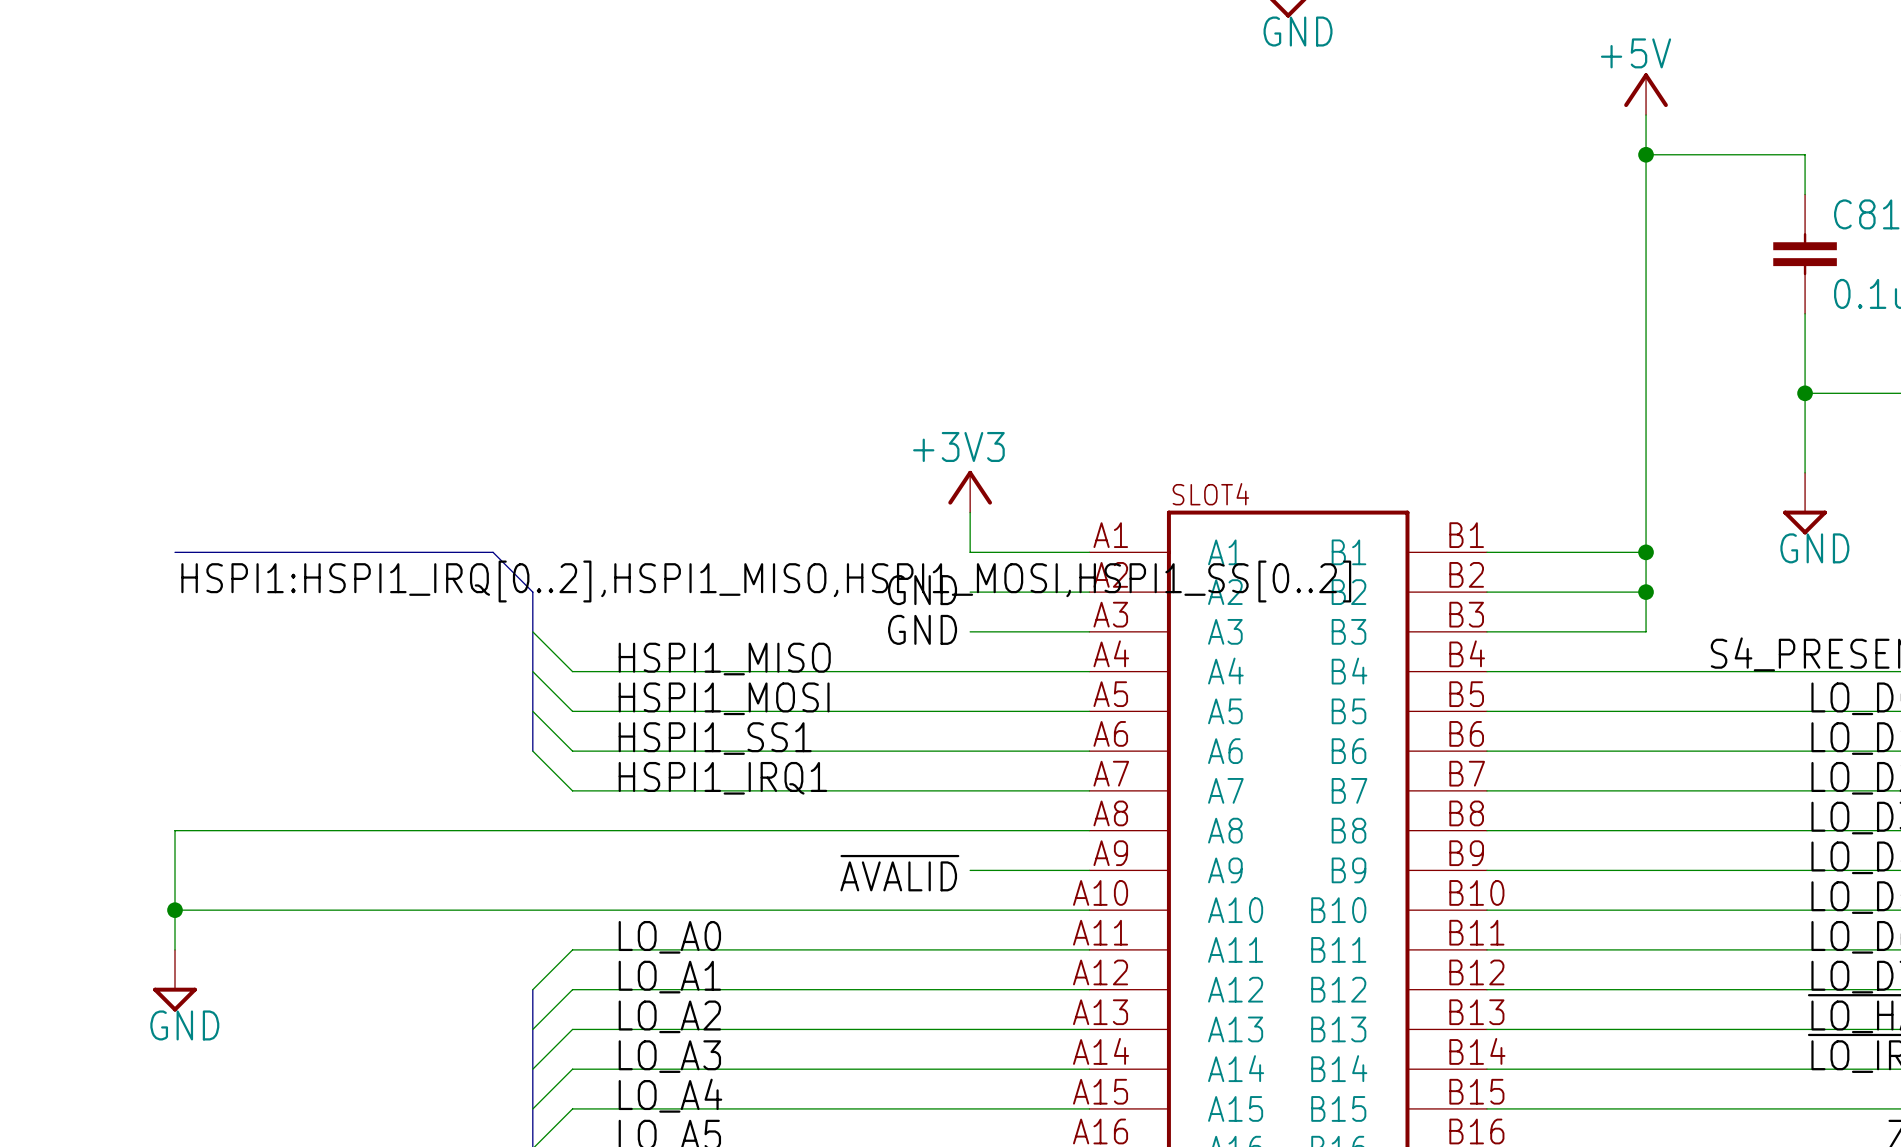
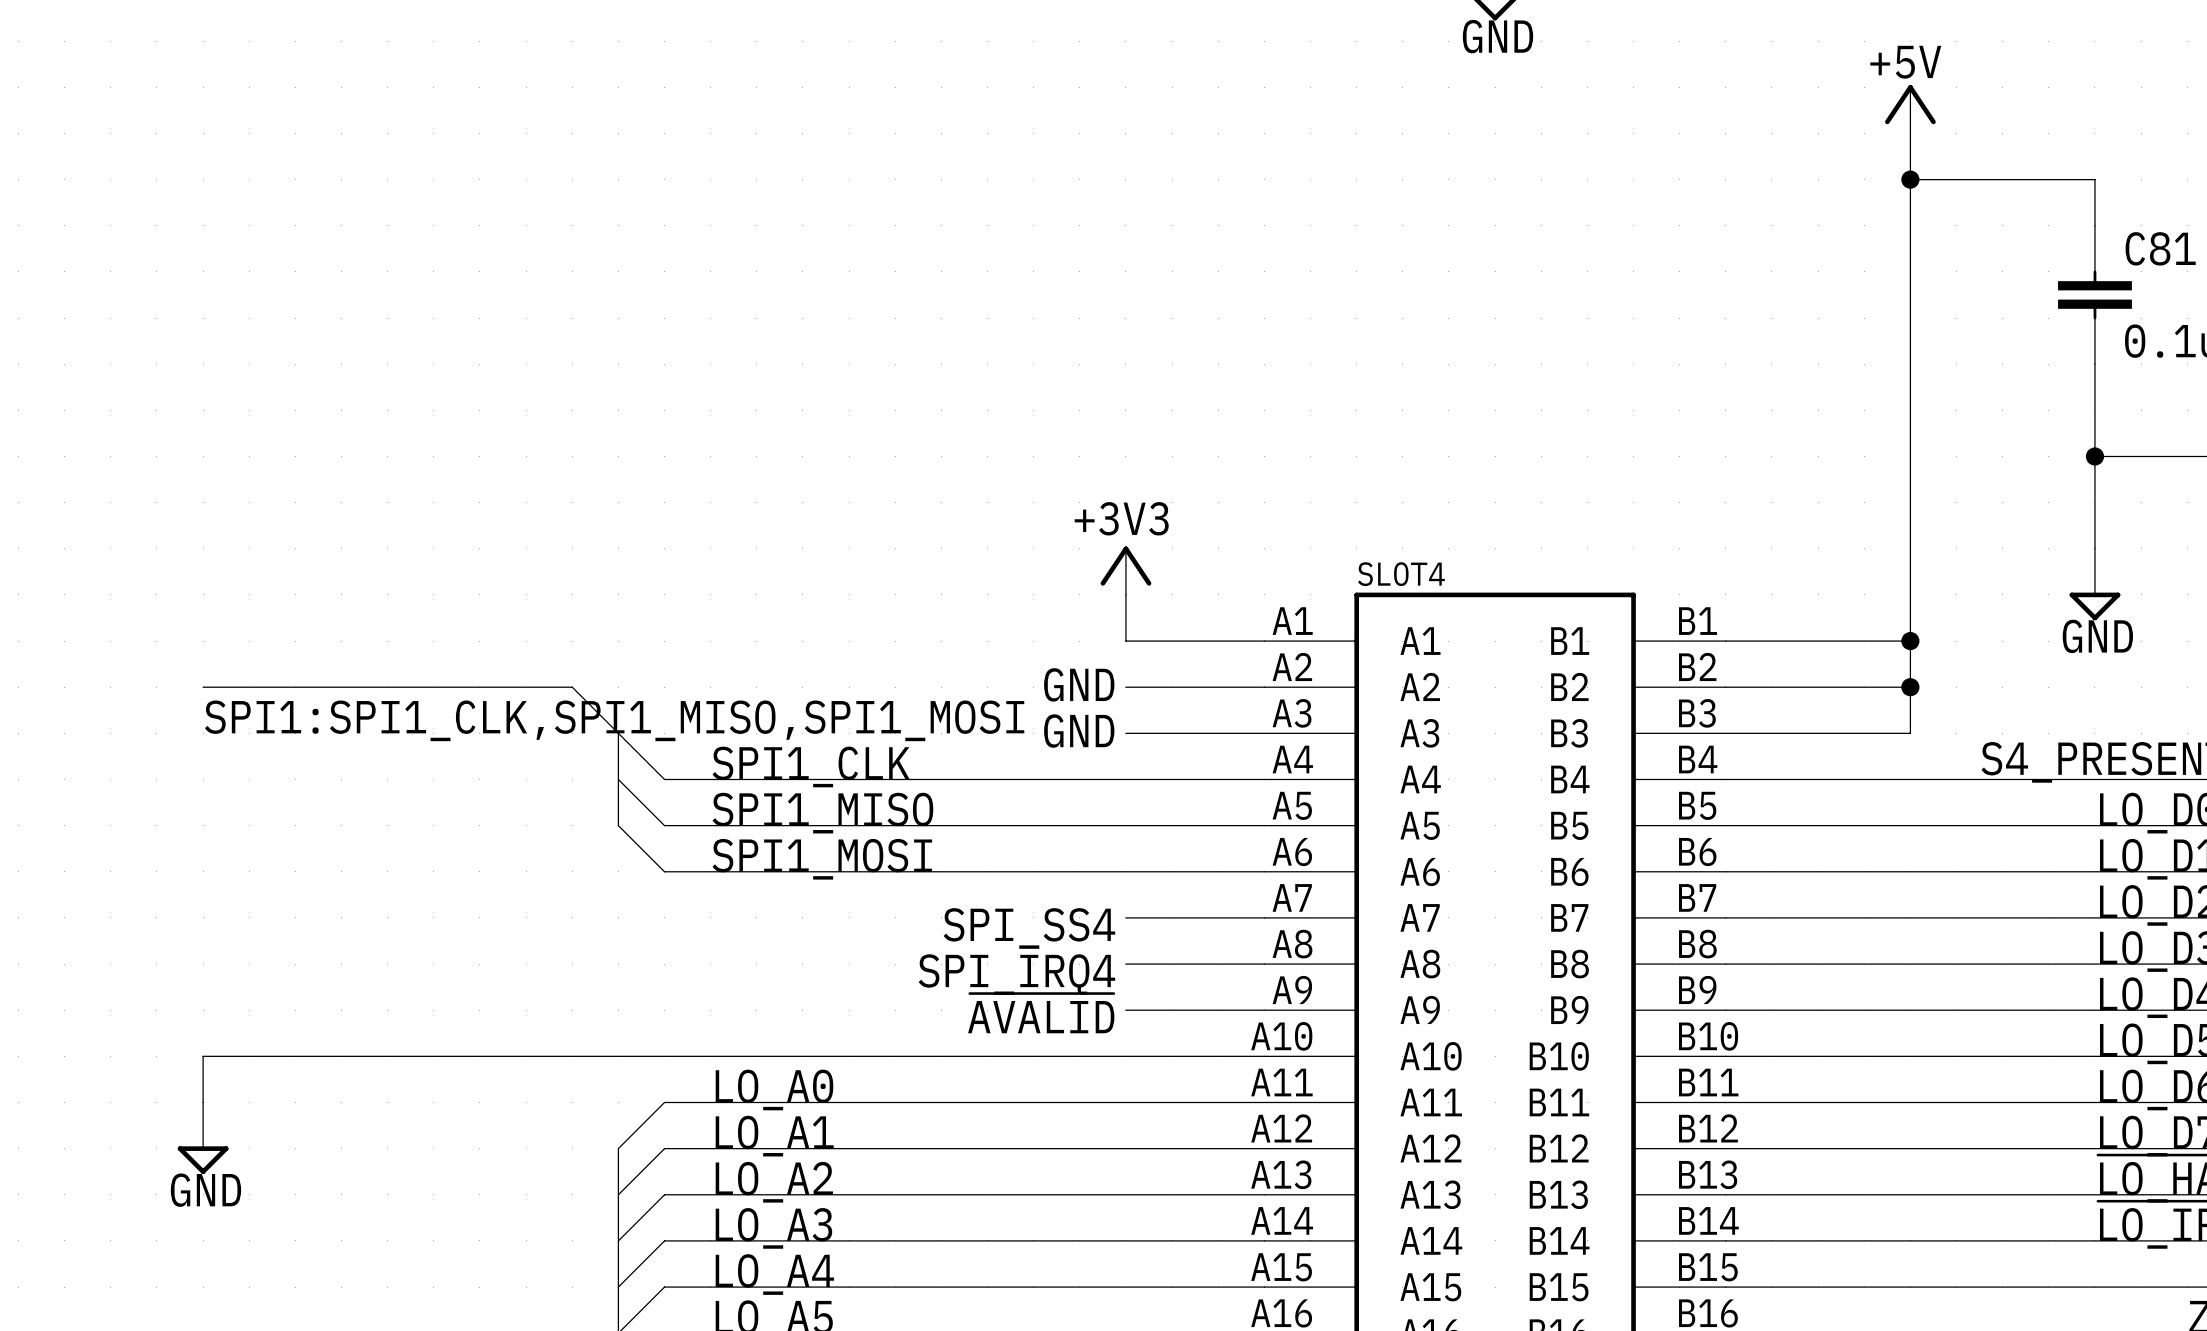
bus: (175, 552) (493, 552) (532, 592) (532, 631) -> (203, 687) (572, 687) (618, 733)
label: HSPI1:HSPI1_IRQ[0..2],HSPI1_MISO,HSPI1_MOSI,HSPI1_SS[0..2] (766, 581) -> SPI1:SPI1_CLK,SPI1_MISO,SPI1_MOSI (614, 720)
label: HSPI1_MISO (724, 659) -> SPI1_CLK (811, 766)
label: HSPI1_MOSI (724, 698) -> SPI1_MISO (822, 813)
bus: (532, 711) (532, 751) -> none
label: HSPI1_SS1 (715, 738) -> SPI1_MOSI (822, 859)
wire: (532, 751) (572, 790) (970, 790) -> none
label: HSPI1_IRQ1 (722, 778) -> none
label: none -> SPI_SS4 (1029, 928)
wire: (970, 830) (175, 830) (175, 910) -> none
label: none -> SPI_IRQ4 (1016, 974)
junction: (175, 910) -> none

